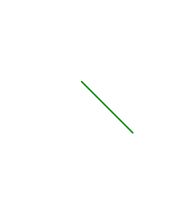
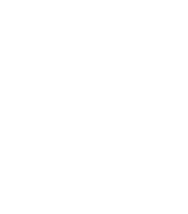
wire: (81, 81) (132, 132) -> none

